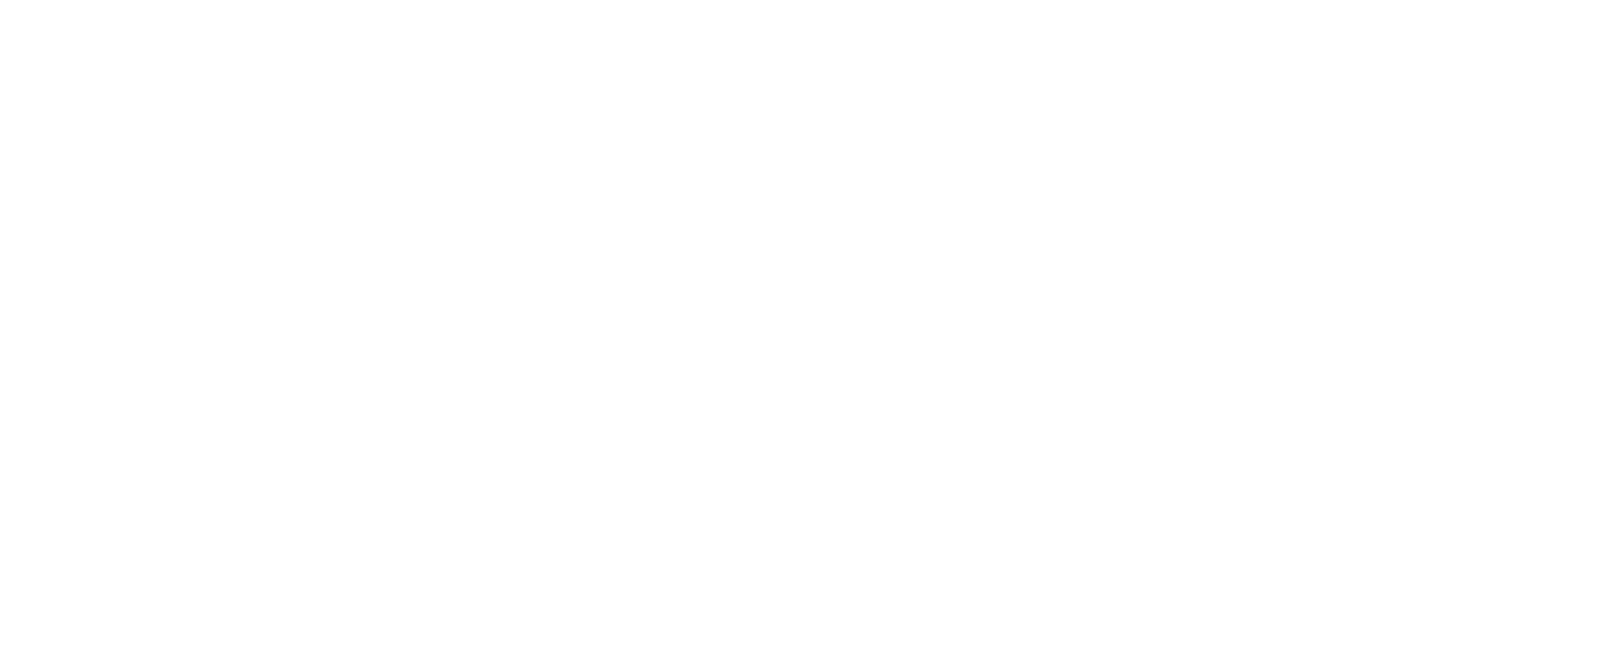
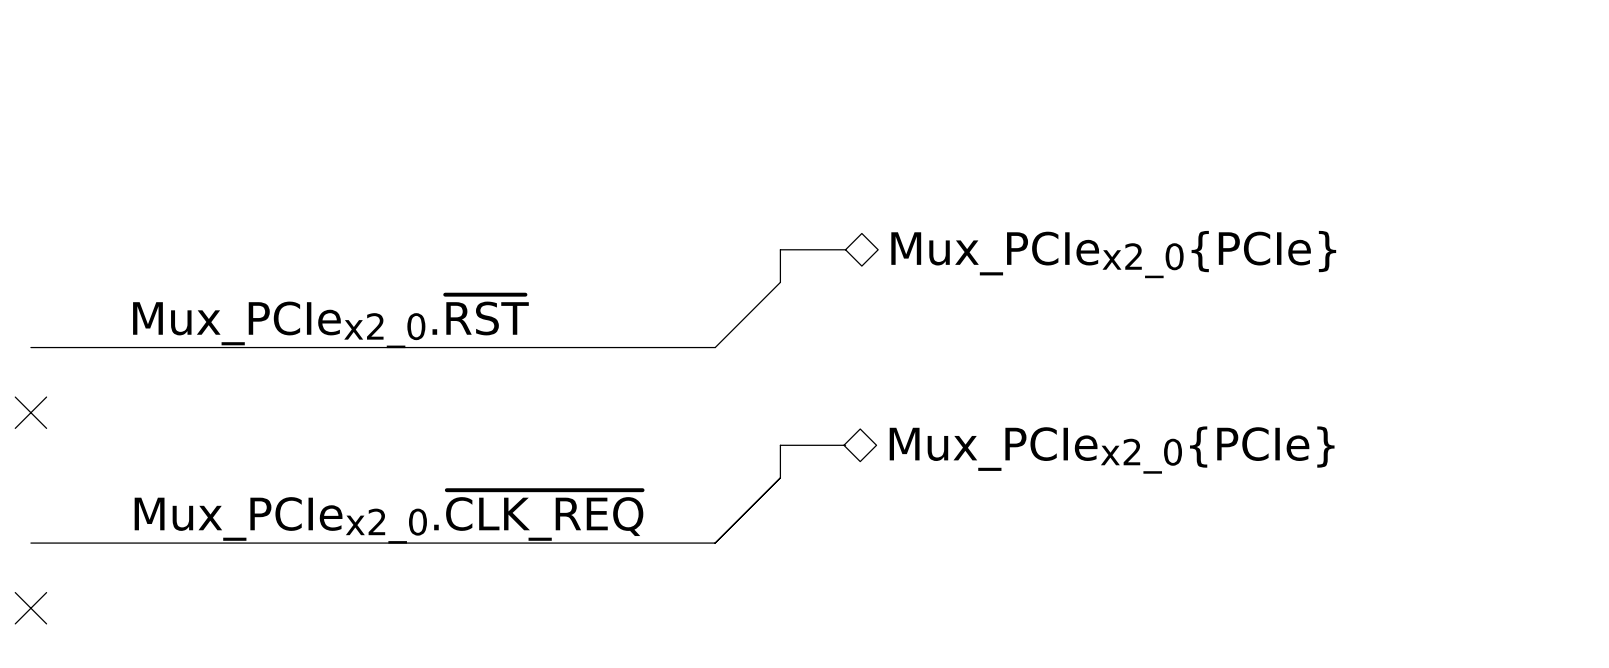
bus: none -> (845, 249) (780, 249) (780, 282)
hierarchical label: none -> Mux_PCIex2_0{PCIe} (1113, 254)
wire: none -> (780, 282) (715, 347) (30, 347)
label: none -> Mux_PCIex2_0.~{RST} (330, 321)
no-connect mark: none -> (30, 412)
bus: none -> (845, 445) (780, 445) (780, 477)
hierarchical label: none -> Mux_PCIex2_0{PCIe} (1112, 450)
wire: none -> (780, 477) (715, 543) (30, 543)
label: none -> Mux_PCIex2_0.~{CLK_REQ} (389, 516)
no-connect mark: none -> (30, 608)

